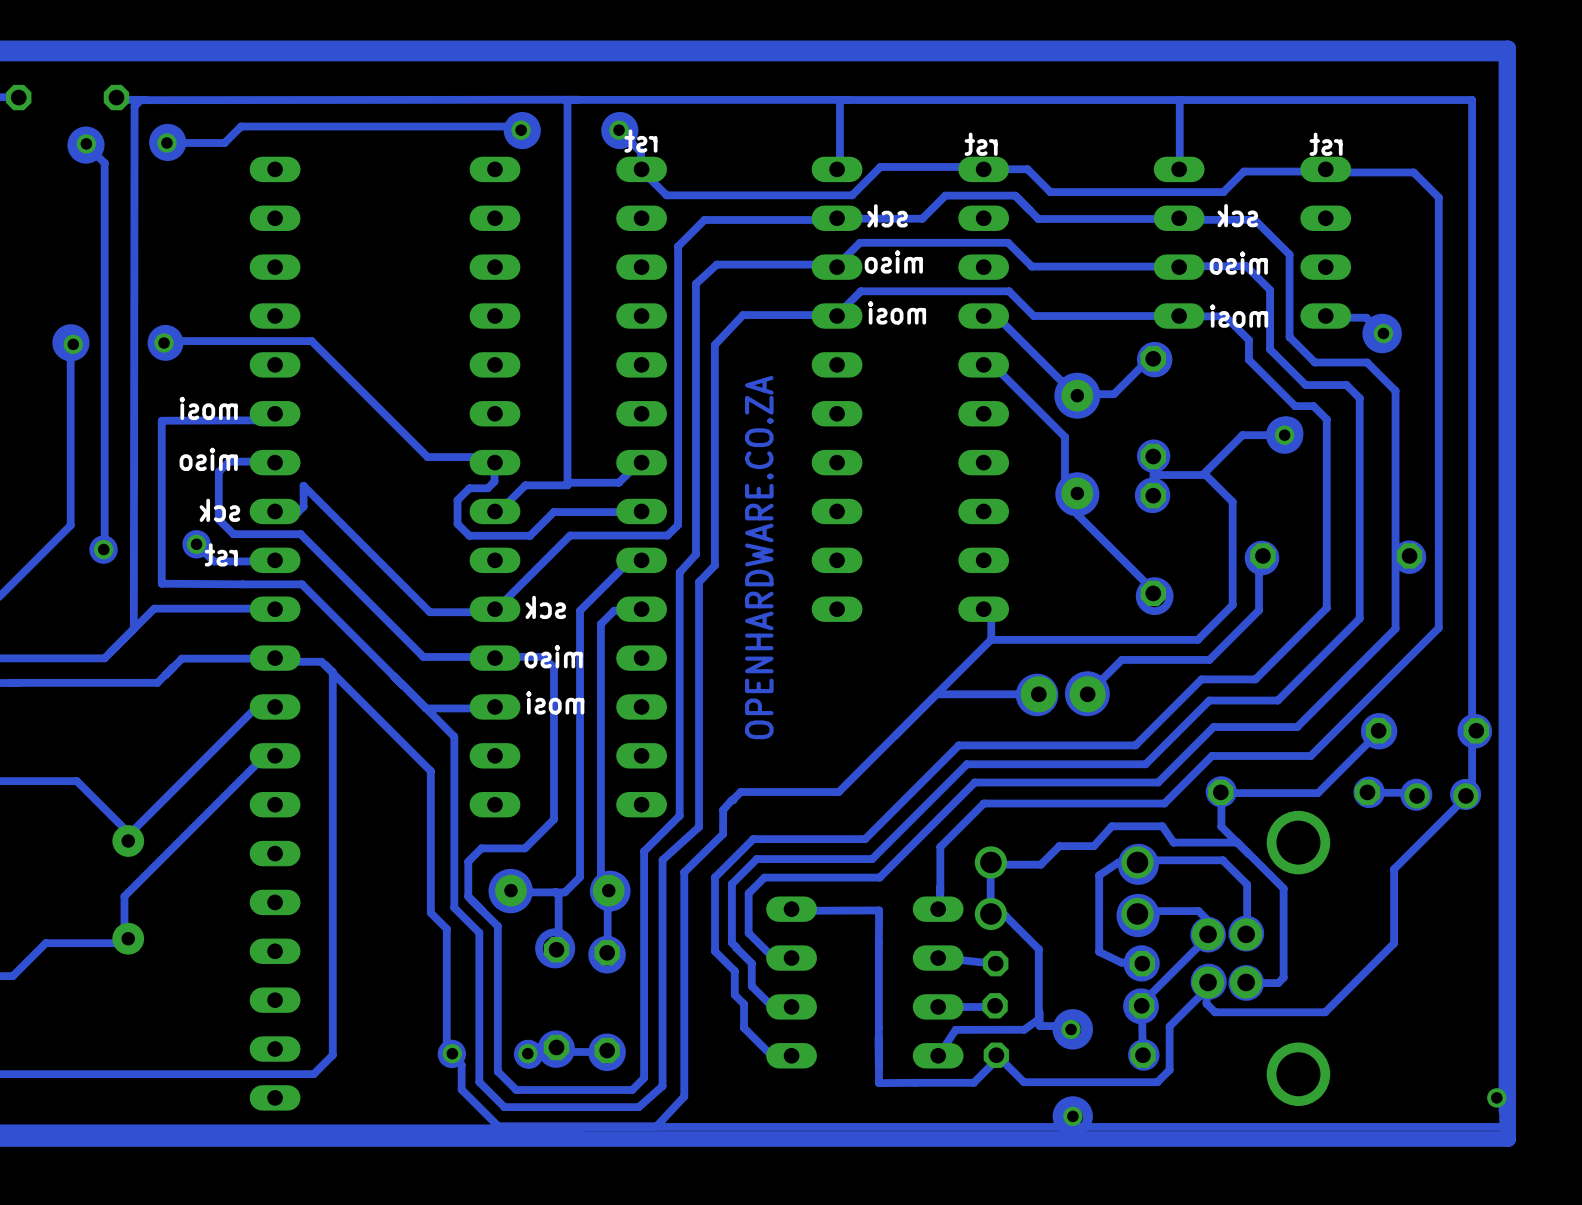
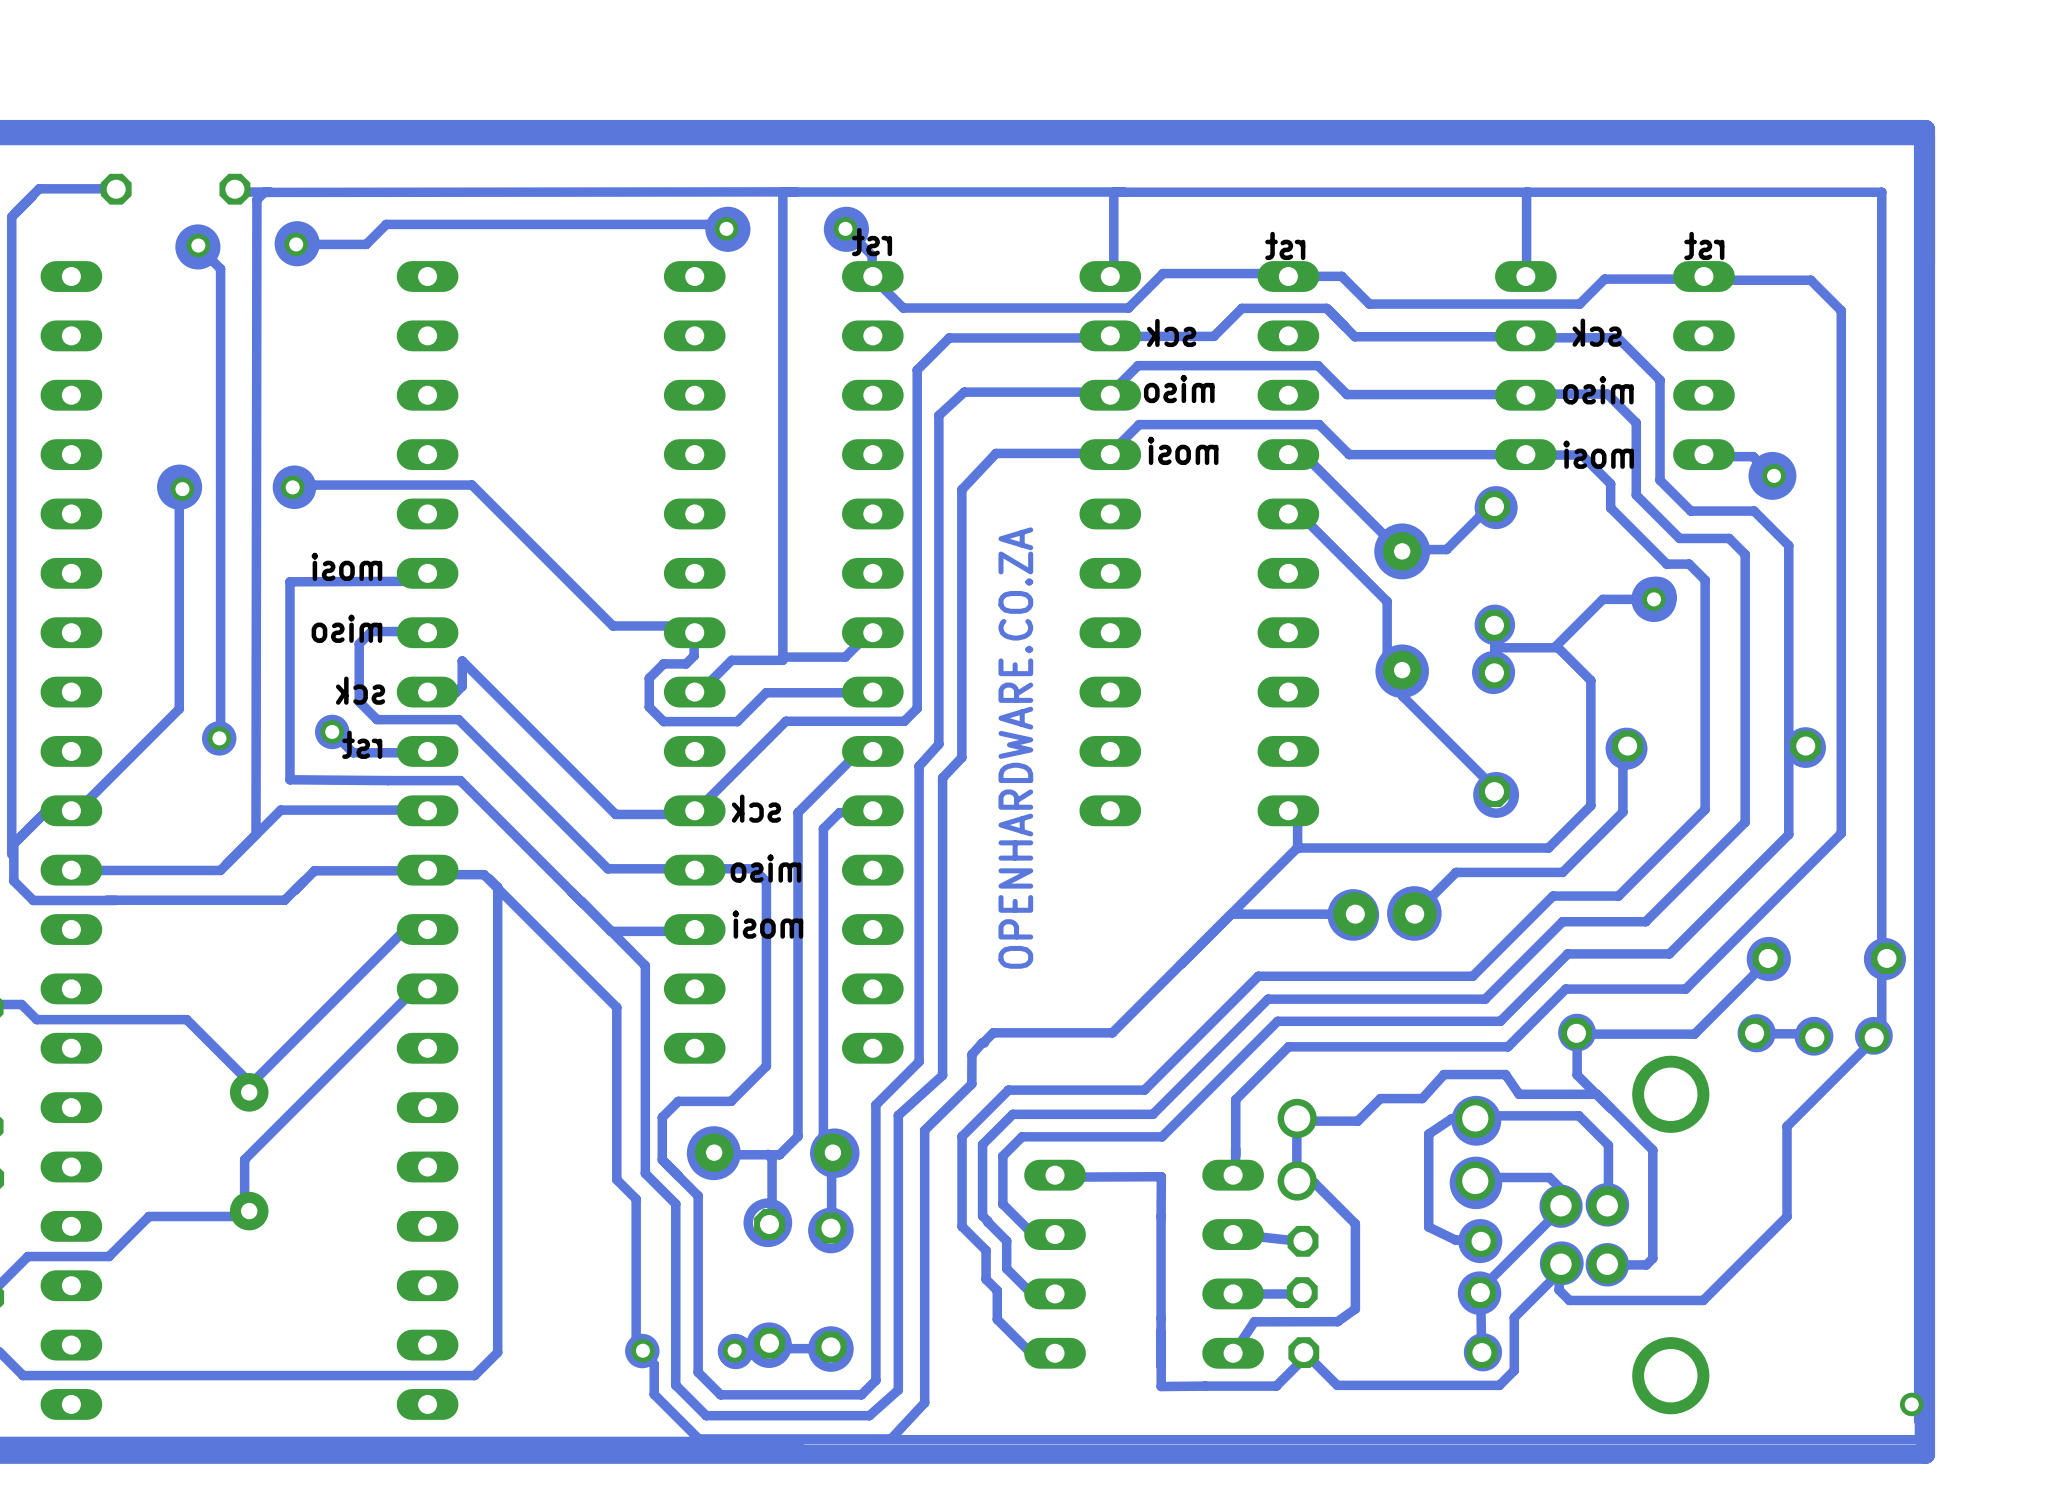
drawing: [1052, 1009, 1093, 1050] -> none
track: (1039, 1012) (1039, 1026) (1060, 1026) -> none
via: (1071, 1029) -> none
drawing: [1052, 1096, 1093, 1137] -> none
via: (1072, 1116) -> none

